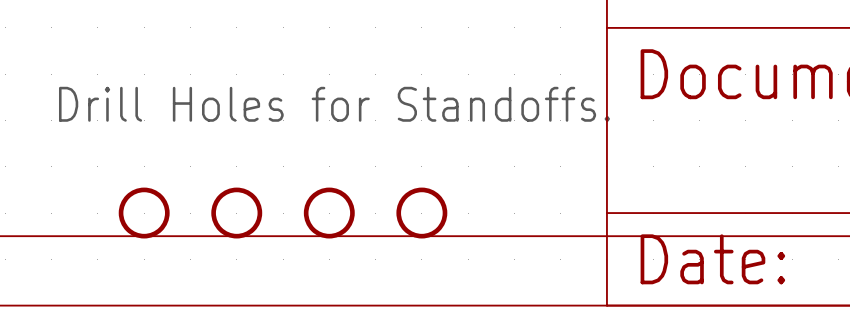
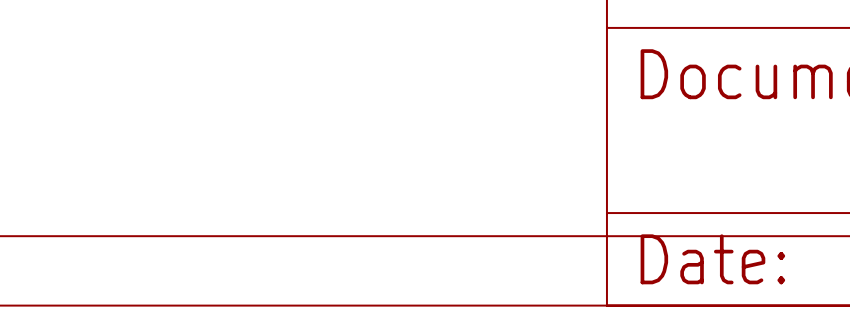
text: Drill Holes for Standoffs. (334, 104) -> none
part: (144, 213) -> none
part: (236, 213) -> none
part: (329, 213) -> none
part: (421, 213) -> none

